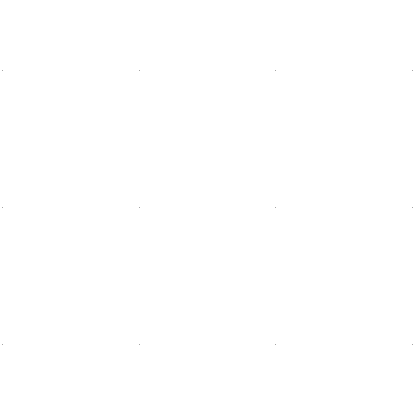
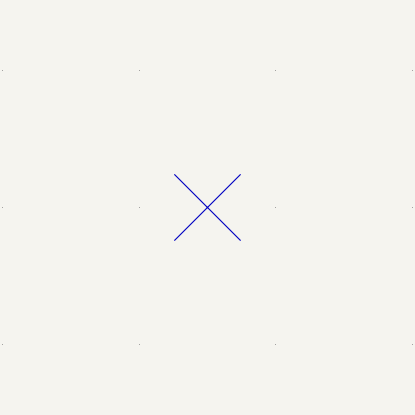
no-connect mark: none -> (207, 207)

